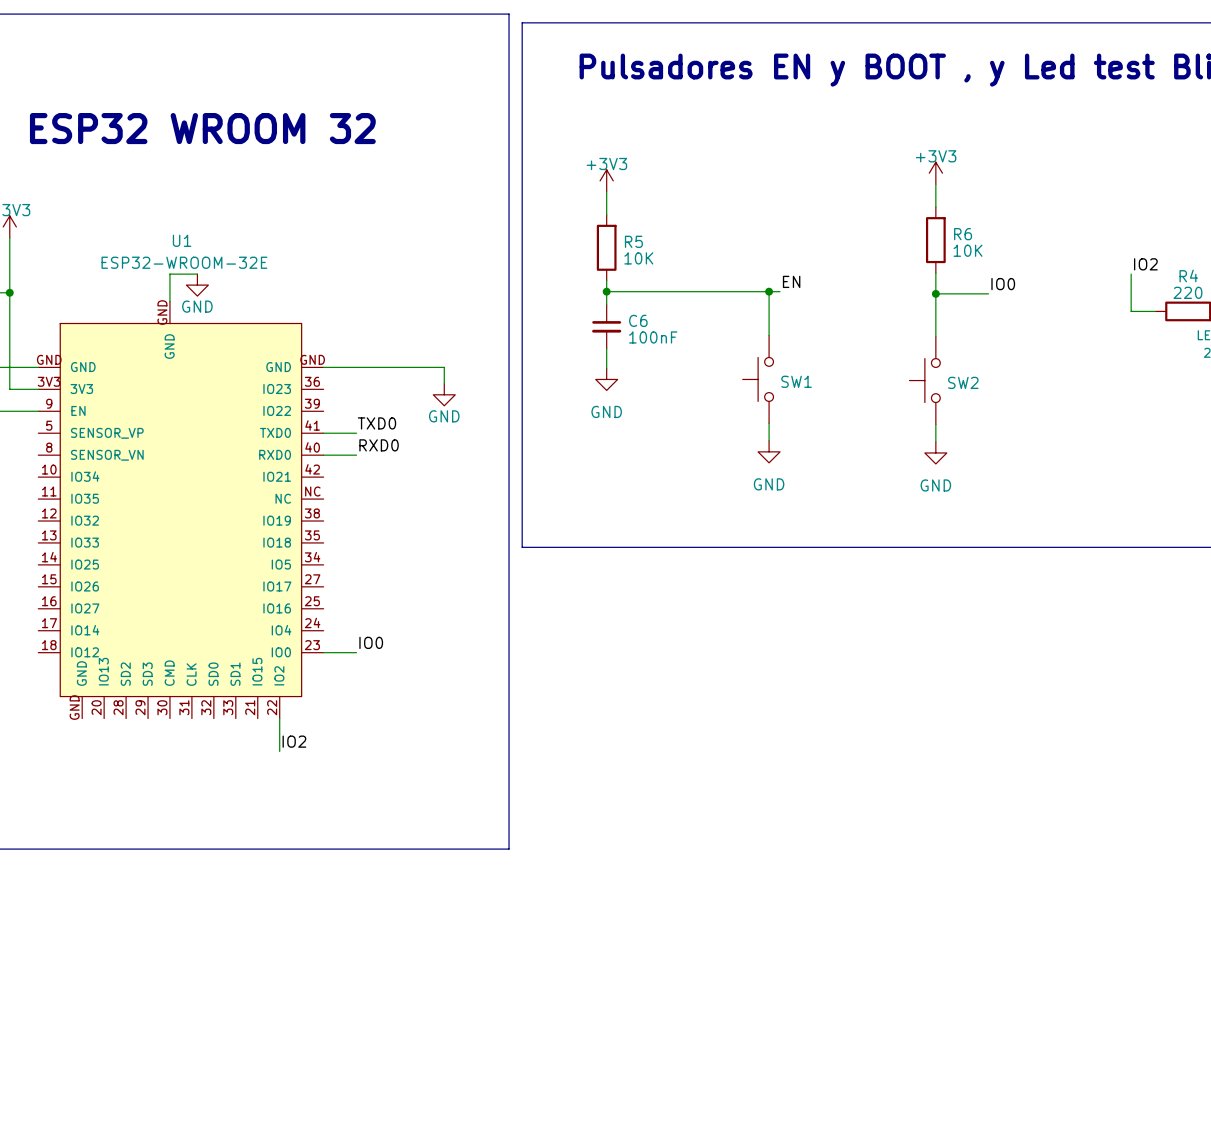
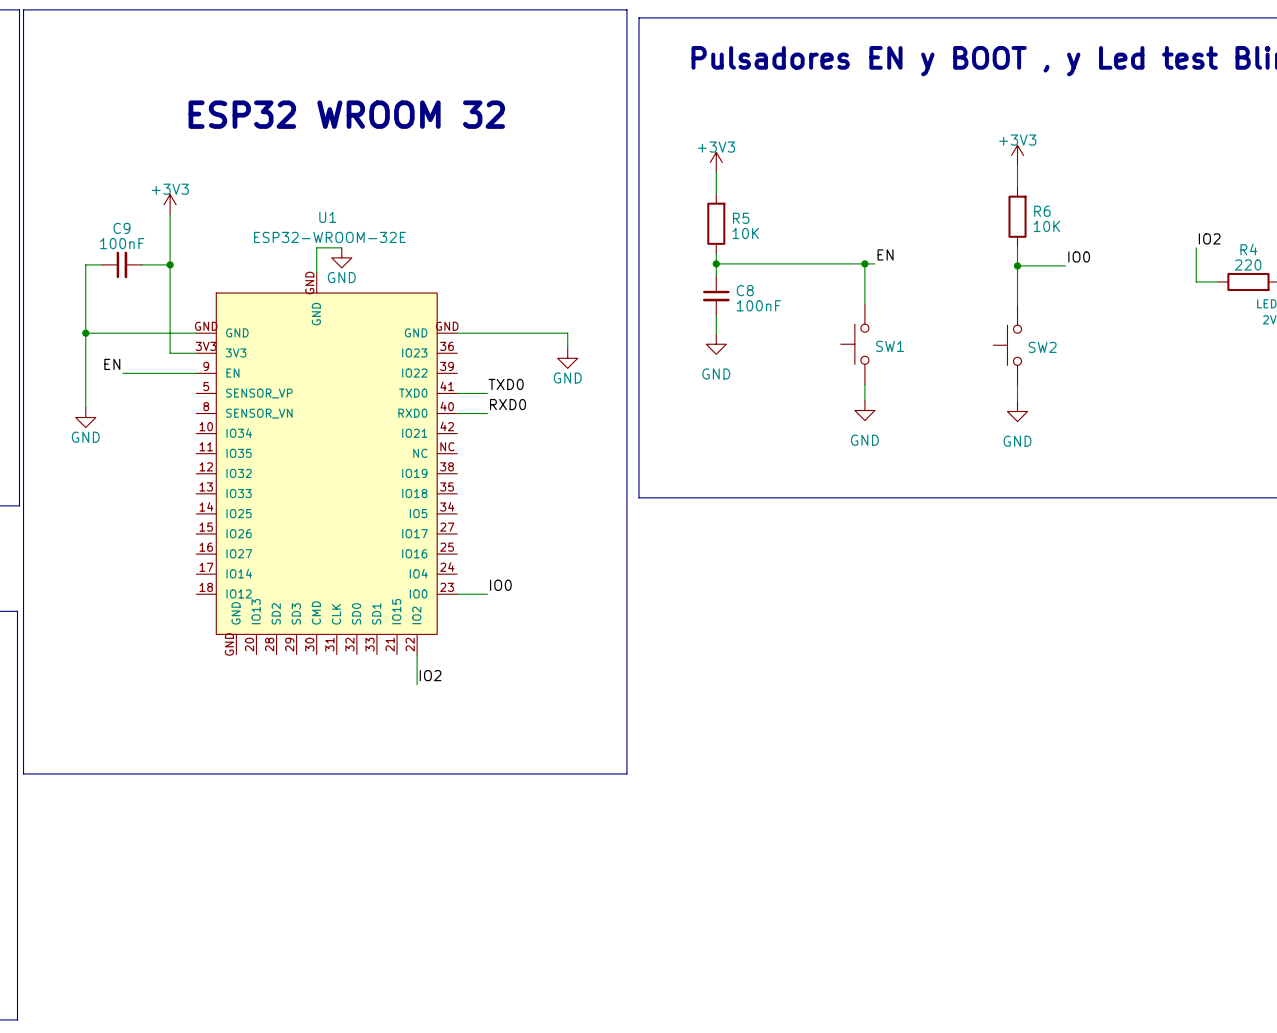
C6 name: C6 (638, 320) -> C8 (745, 290)

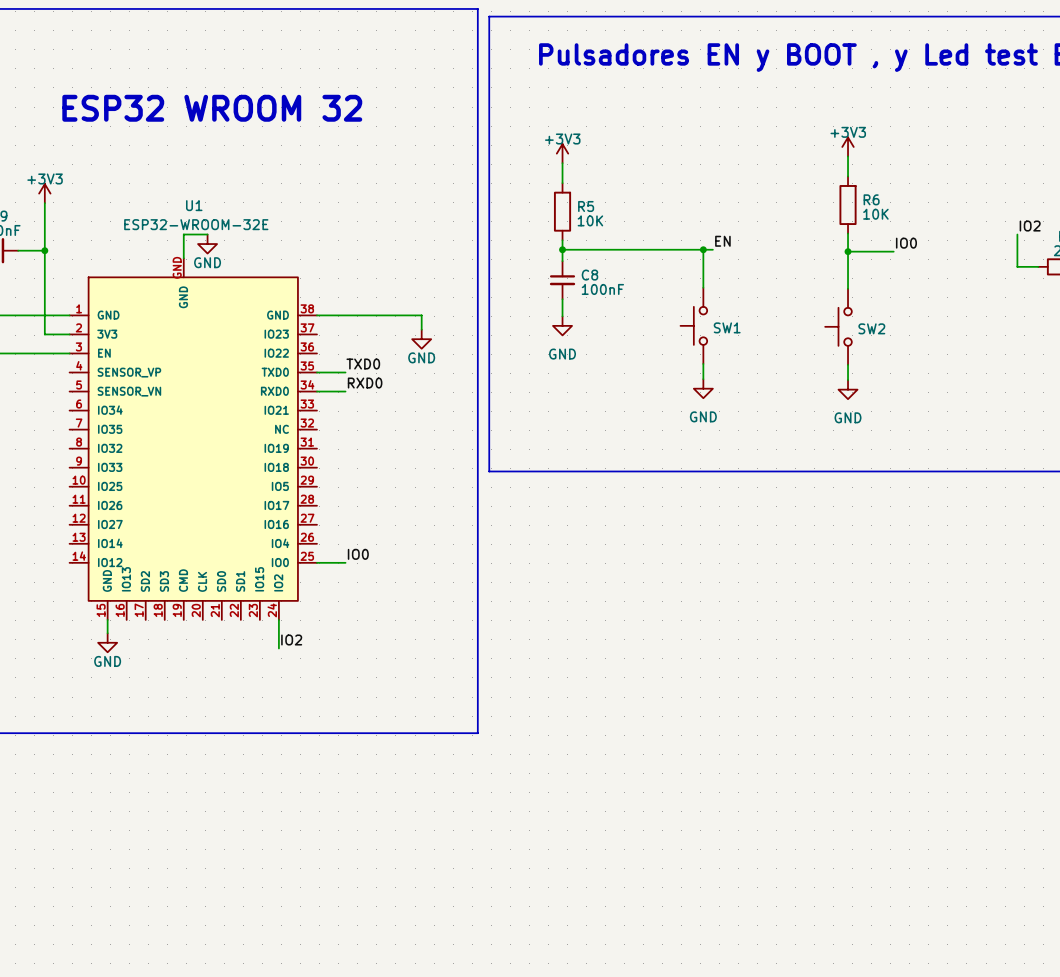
U1 symbol: [196, 272, 458, 655] -> [69, 258, 317, 620]
wire: none -> (107, 619) (107, 633)
power symbol: none -> GND (107, 642)

